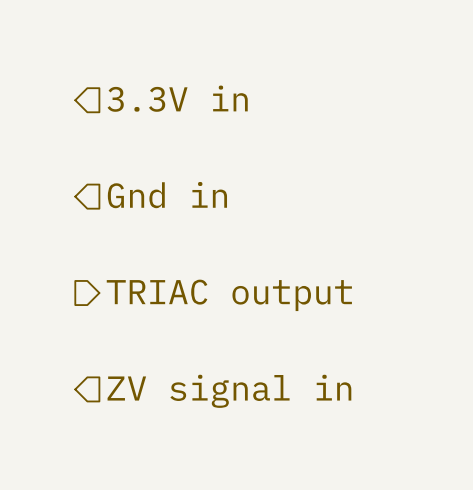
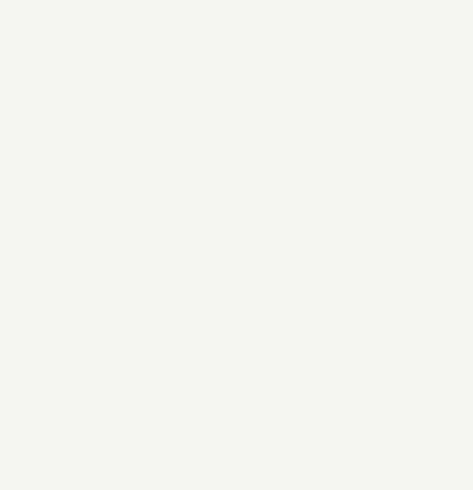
hierarchical label: 3.3V in (177, 98) -> none
hierarchical label: Gnd in (167, 195) -> none
hierarchical label: TRIAC output (229, 295) -> none
hierarchical label: ZV signal in (229, 391) -> none

